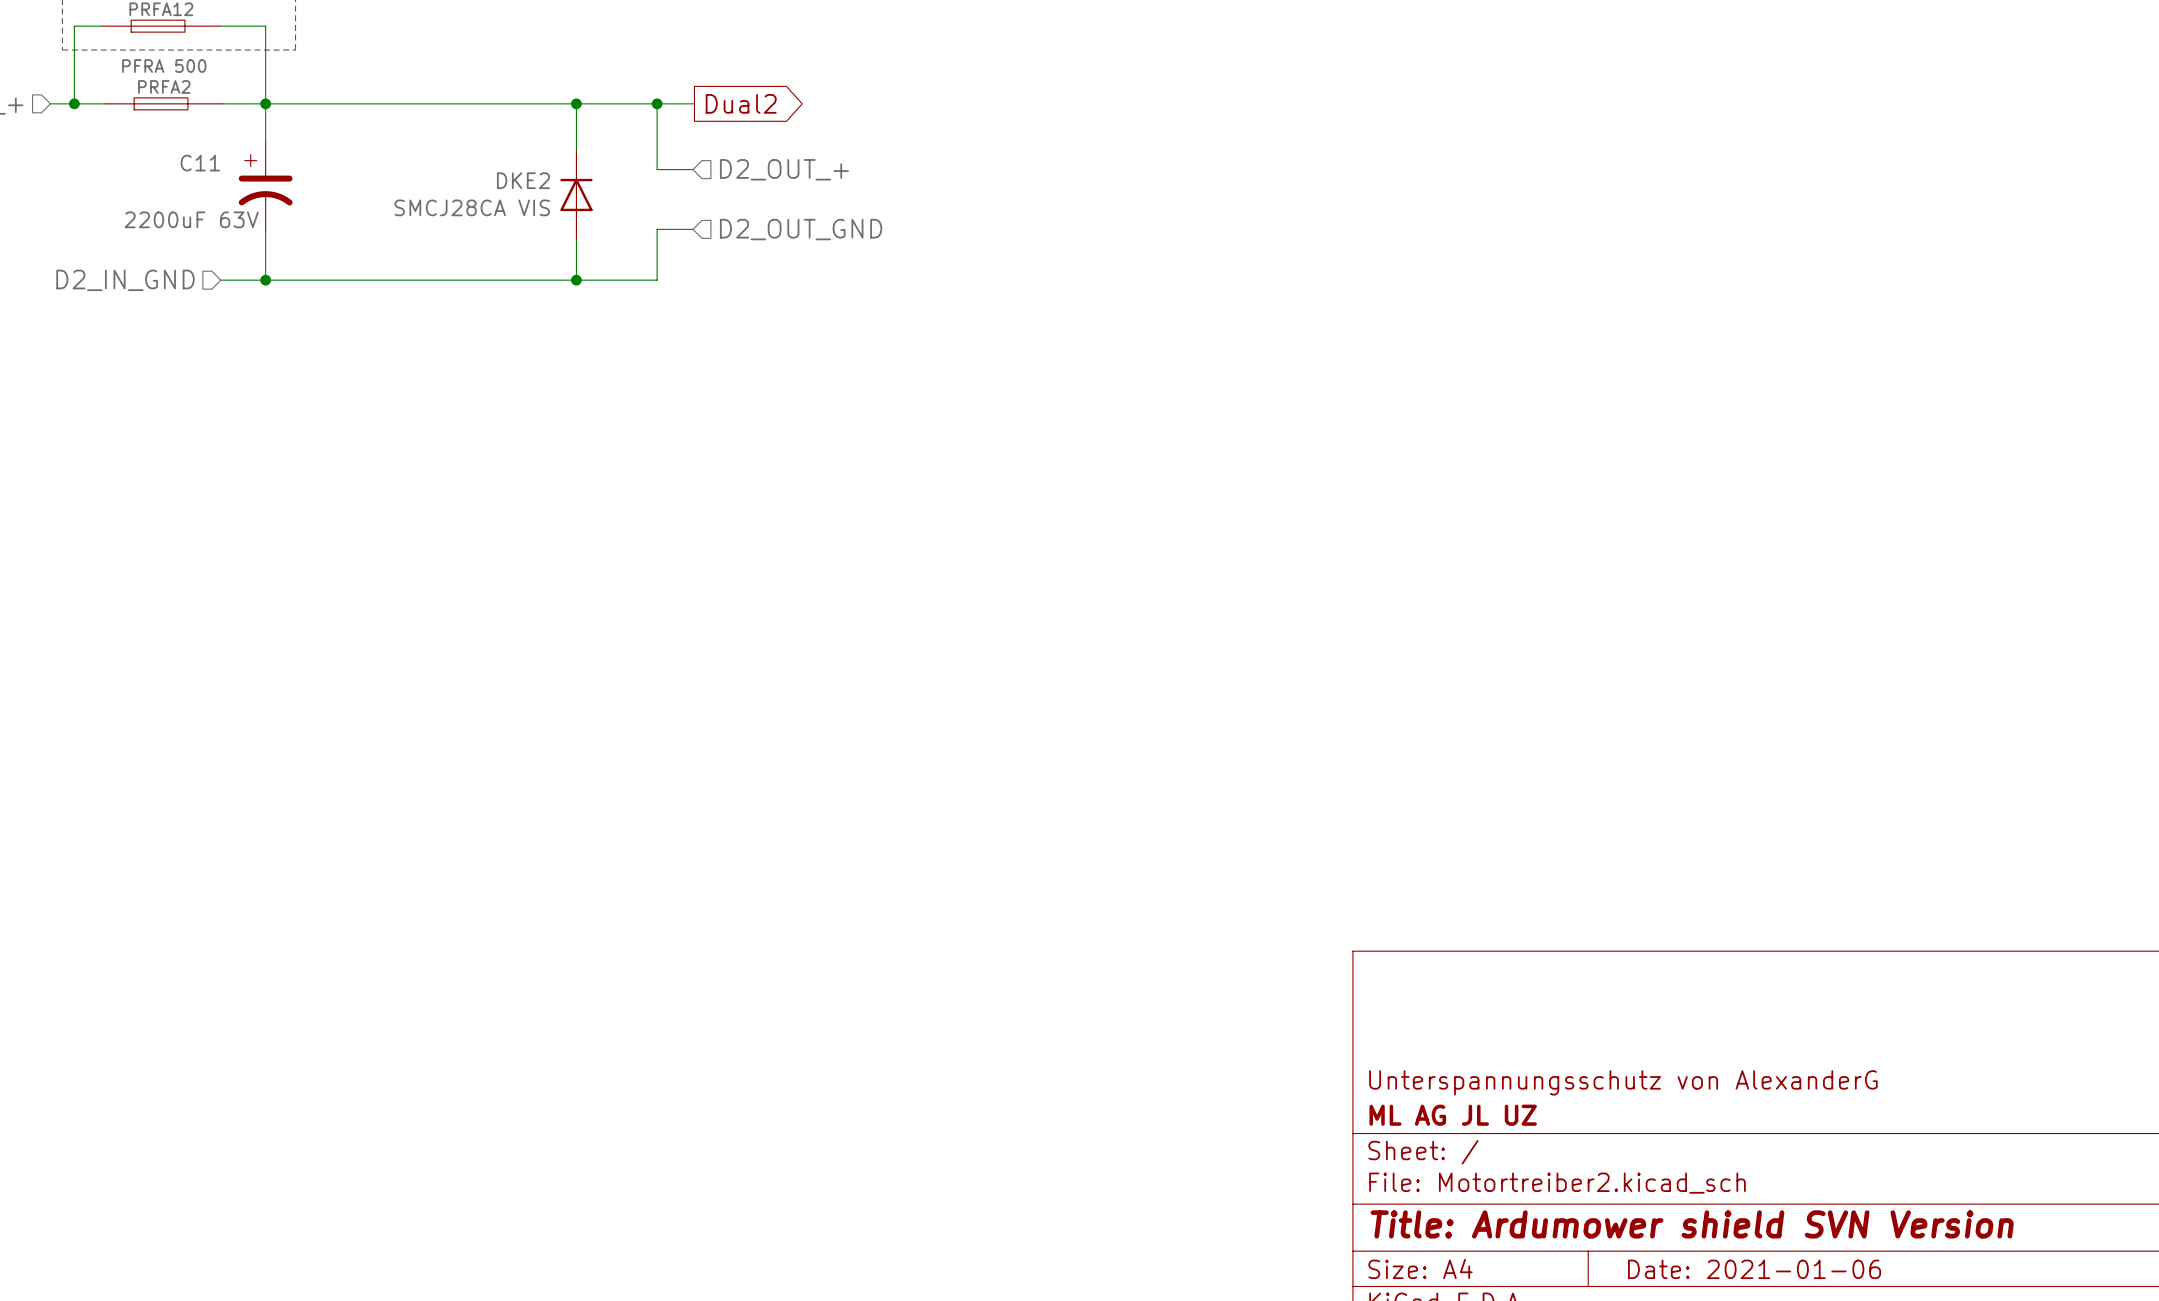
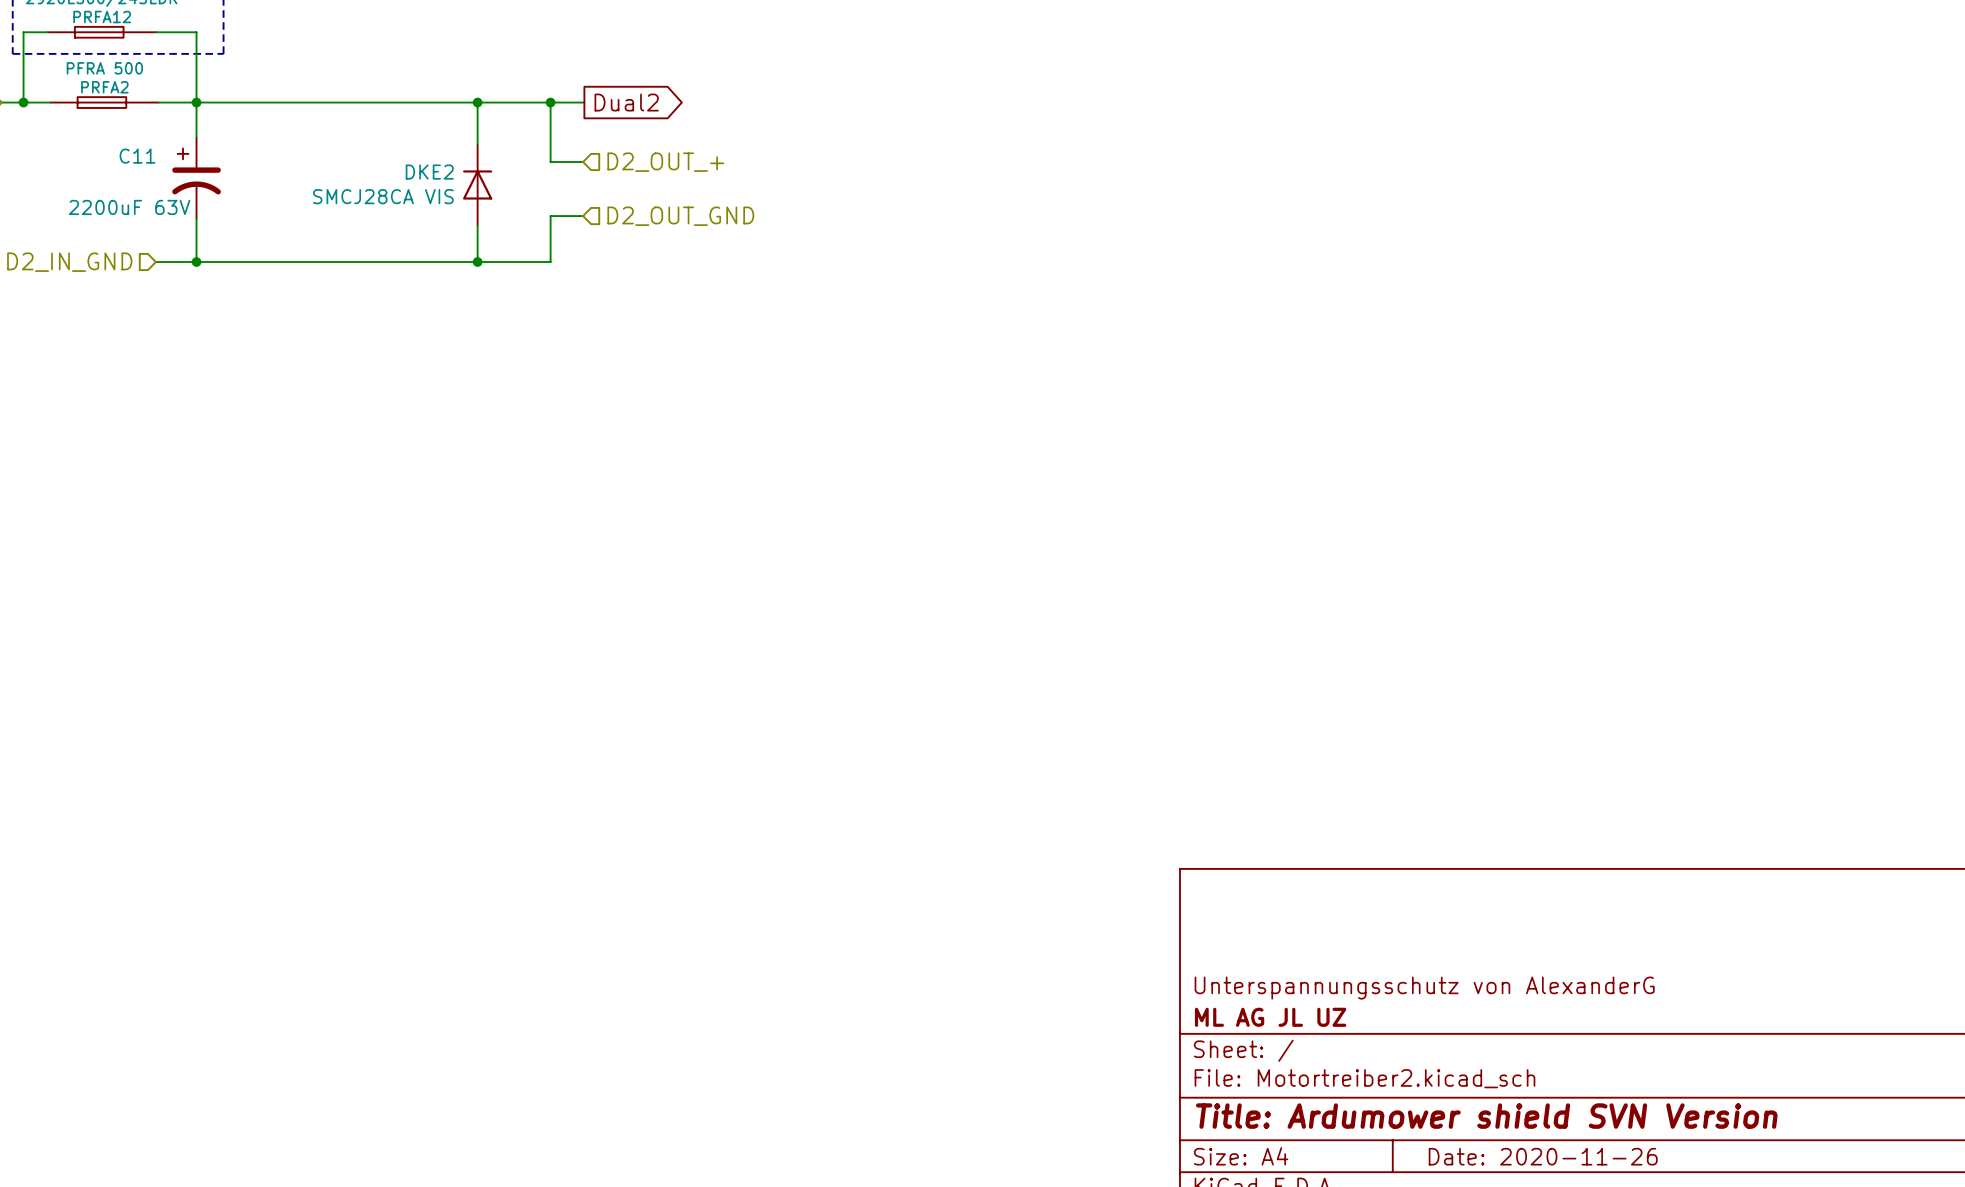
title block: Date: 2021-01-06 (1754, 1269) -> Date: 2020-11-26 (1543, 1156)

